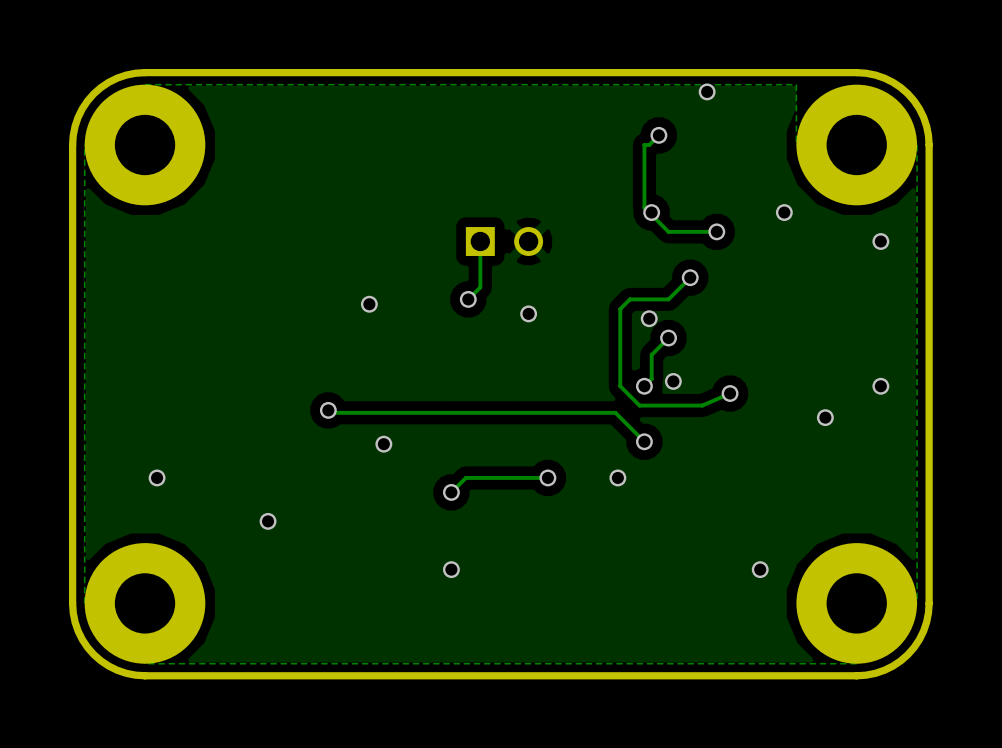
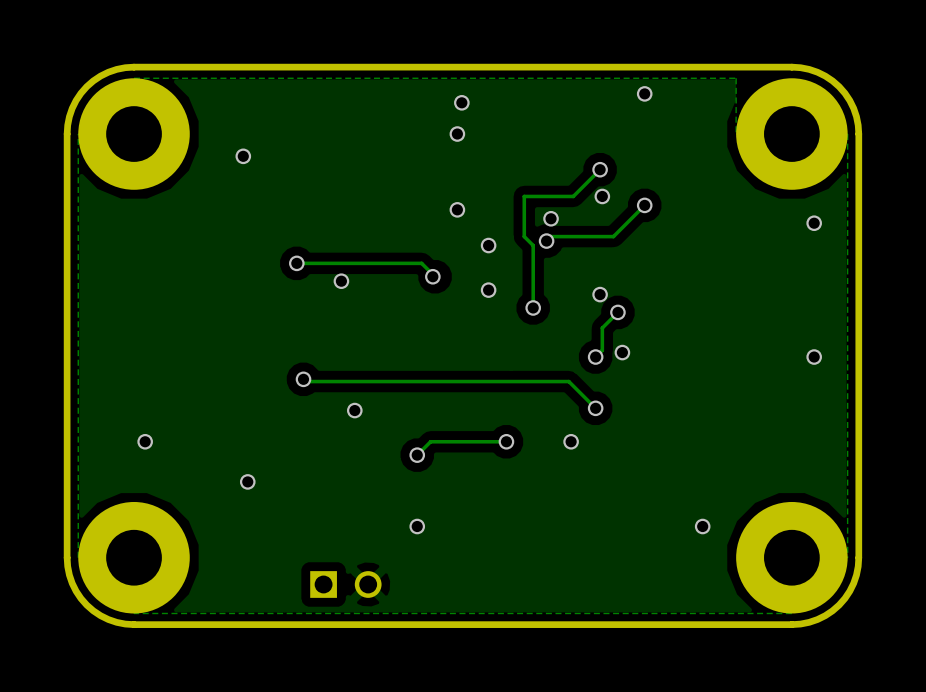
via position: (707, 91) -> (644, 93)
via: none -> (461, 102)
track: (658, 135) (649, 145) (644, 145) (644, 207) (668, 231) (716, 231) -> none
via: (658, 135) -> none
via: none -> (457, 134)
via: none -> (243, 156)
track: none -> (600, 169) (573, 196) (524, 196) (524, 236) (533, 245) (533, 307)
via: none -> (600, 169)
via: (784, 212) -> none
track: none -> (644, 205) (613, 236) (551, 236) (546, 241)
via: none -> (457, 209)
via position: (716, 231) -> (644, 205)
via: none -> (551, 218)
track: (480, 241) (480, 287) (468, 299) -> none
part position: (504, 241) -> (345, 584)
via: none -> (546, 241)
via: none -> (488, 245)
track: (690, 277) (668, 299) (629, 299) (620, 309) (620, 386) (639, 405) (702, 405) (730, 393) -> none
via: (690, 277) -> none
track: none -> (296, 263) (421, 263) (435, 276)
via: none -> (296, 263)
via: none -> (533, 307)
via: (730, 393) -> none
via: (825, 417) -> none

